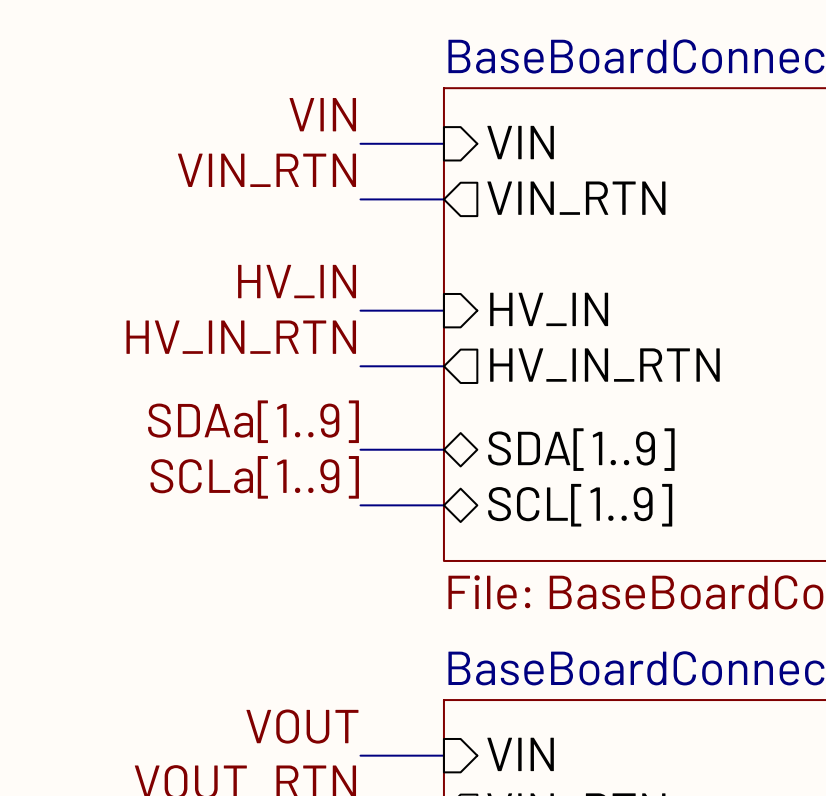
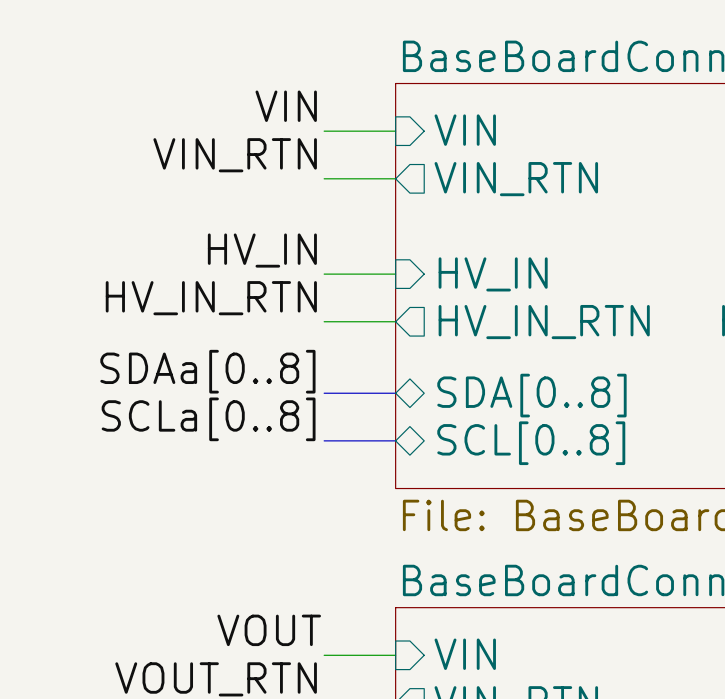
label: SDAa[1..9] (253, 421) -> SDAa[0..8] (207, 371)
sheet pin: SDA[1..9] (581, 449) -> SDA[0..8] (531, 395)
label: SCLa[1..9] (254, 477) -> SCLa[0..8] (208, 419)
sheet pin: SCL[1..9] (580, 505) -> SCL[0..8] (531, 443)

